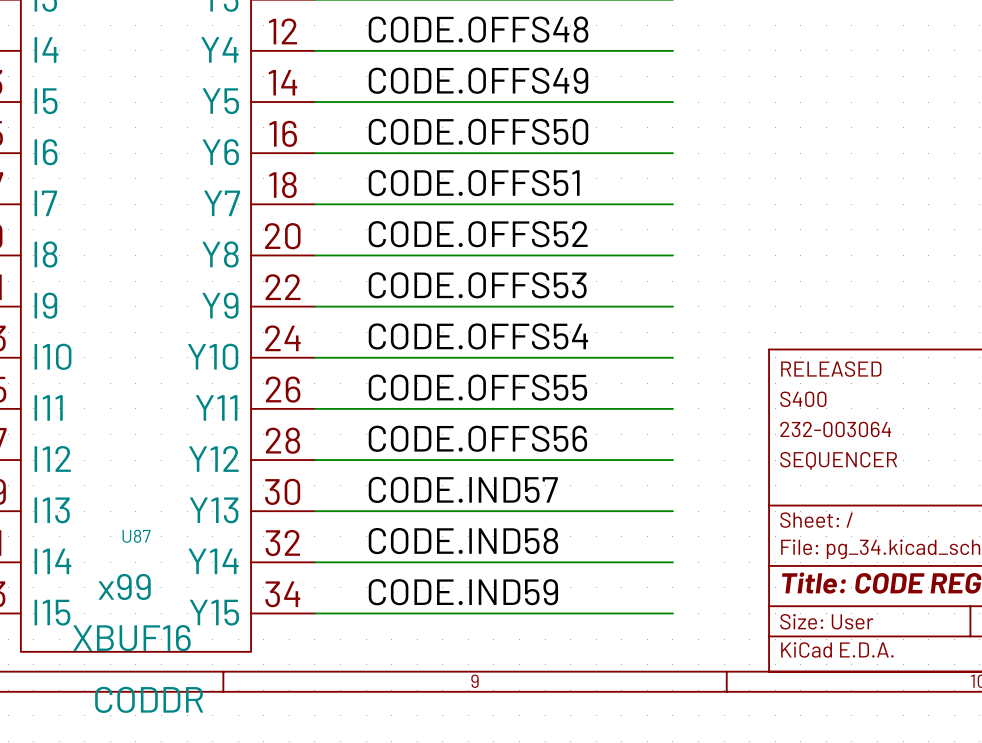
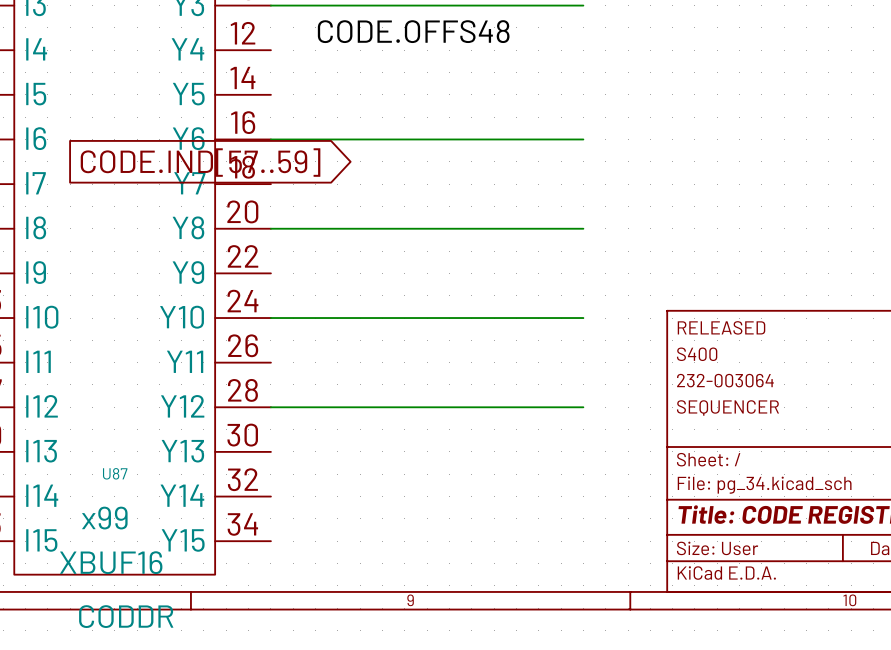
wire: (314, 50) (672, 50) -> none
label: CODE.OFFS49 (478, 80) -> none
wire: (314, 102) (672, 102) -> none
label: CODE.OFFS50 (478, 131) -> none
global label: none -> CODE.IND[57..59] (200, 162)
label: CODE.OFFS51 (474, 183) -> none
wire: (314, 204) (672, 204) -> none
label: CODE.OFFS52 (478, 234) -> none
label: CODE.OFFS53 (477, 285) -> none
wire: (314, 306) (672, 306) -> none
label: CODE.OFFS54 (478, 336) -> none
label: CODE.OFFS55 (477, 387) -> none
wire: (314, 408) (672, 408) -> none
label: CODE.OFFS56 (477, 438) -> none
label: CODE.IND57 (463, 489) -> none
wire: (314, 511) (672, 511) -> none
label: CODE.IND58 (463, 541) -> none
wire: (314, 562) (672, 562) -> none
label: CODE.IND59 (463, 592) -> none
wire: (314, 613) (672, 613) -> none

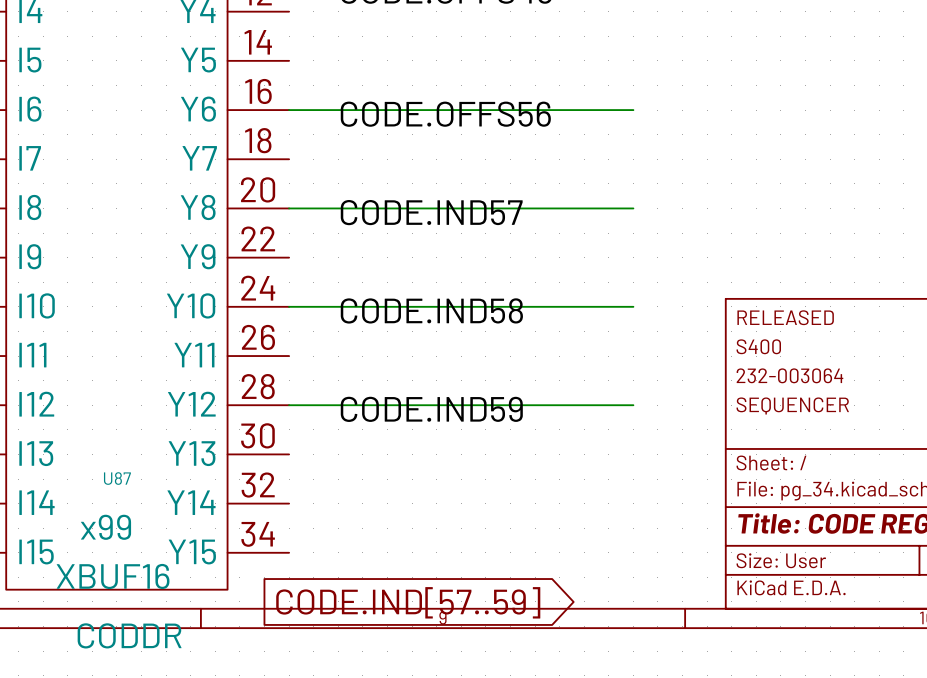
label: none -> CODE.OFFS56 (445, 114)
global label: CODE.IND[57..59] (200, 162) -> none
label: none -> CODE.IND57 (431, 212)
label: none -> CODE.IND58 (431, 310)
label: none -> CODE.IND59 (431, 409)
global label: none -> CODE.IND[57..59] (408, 602)

